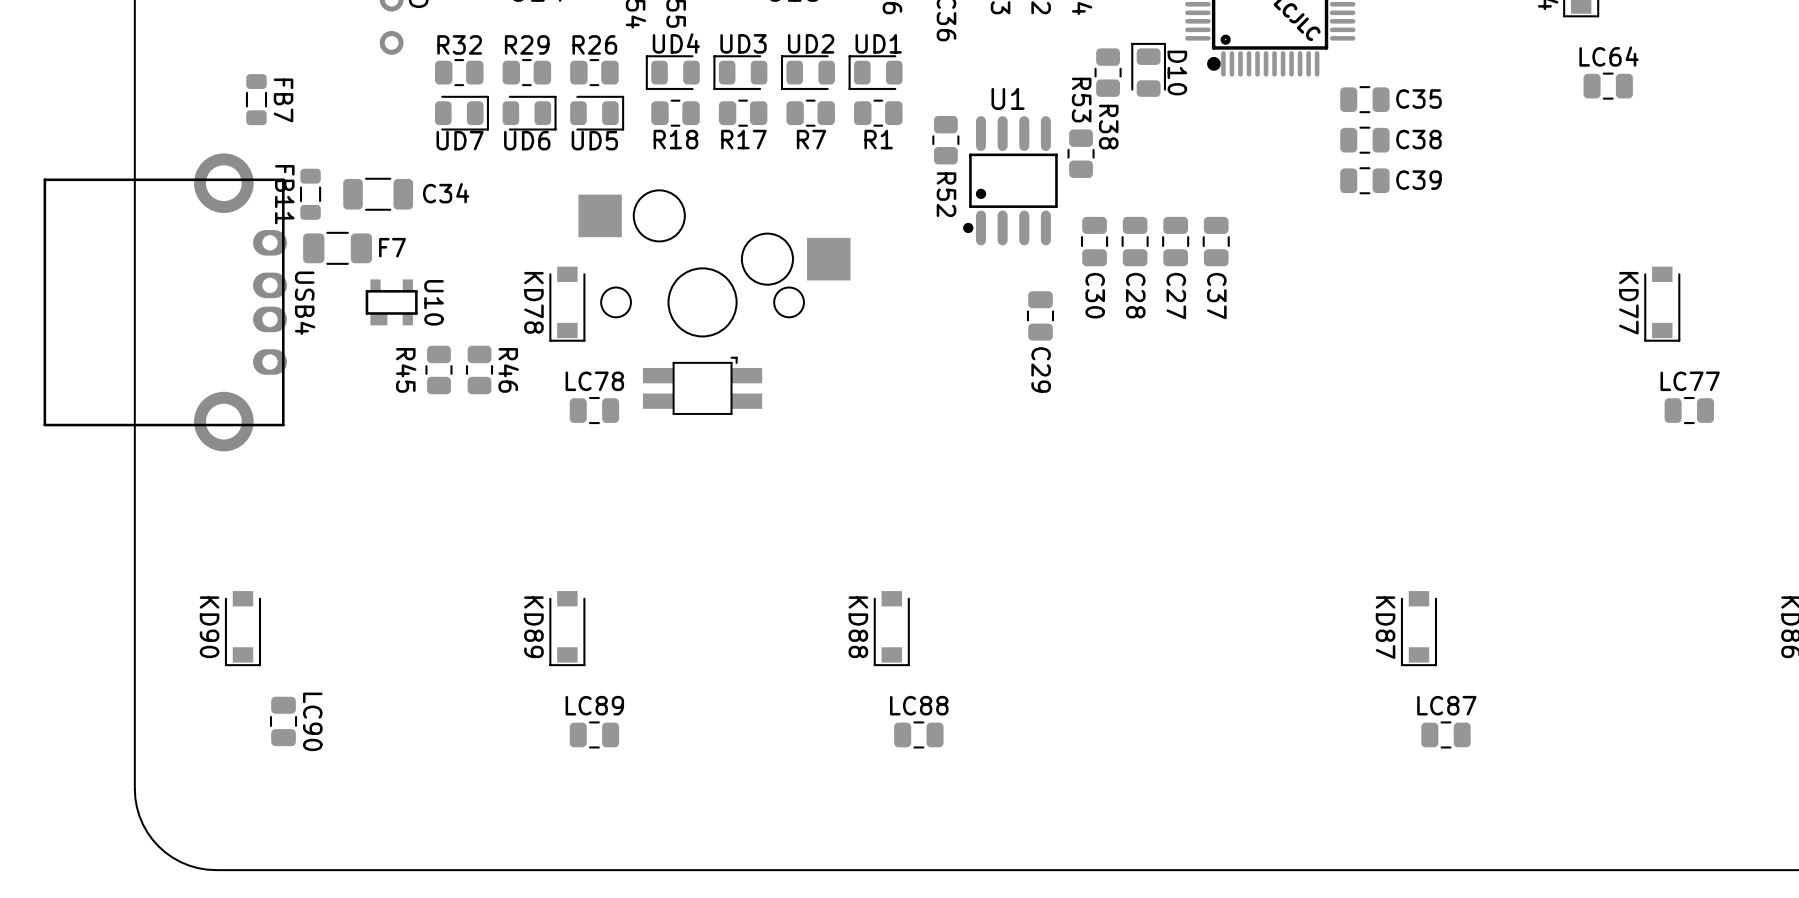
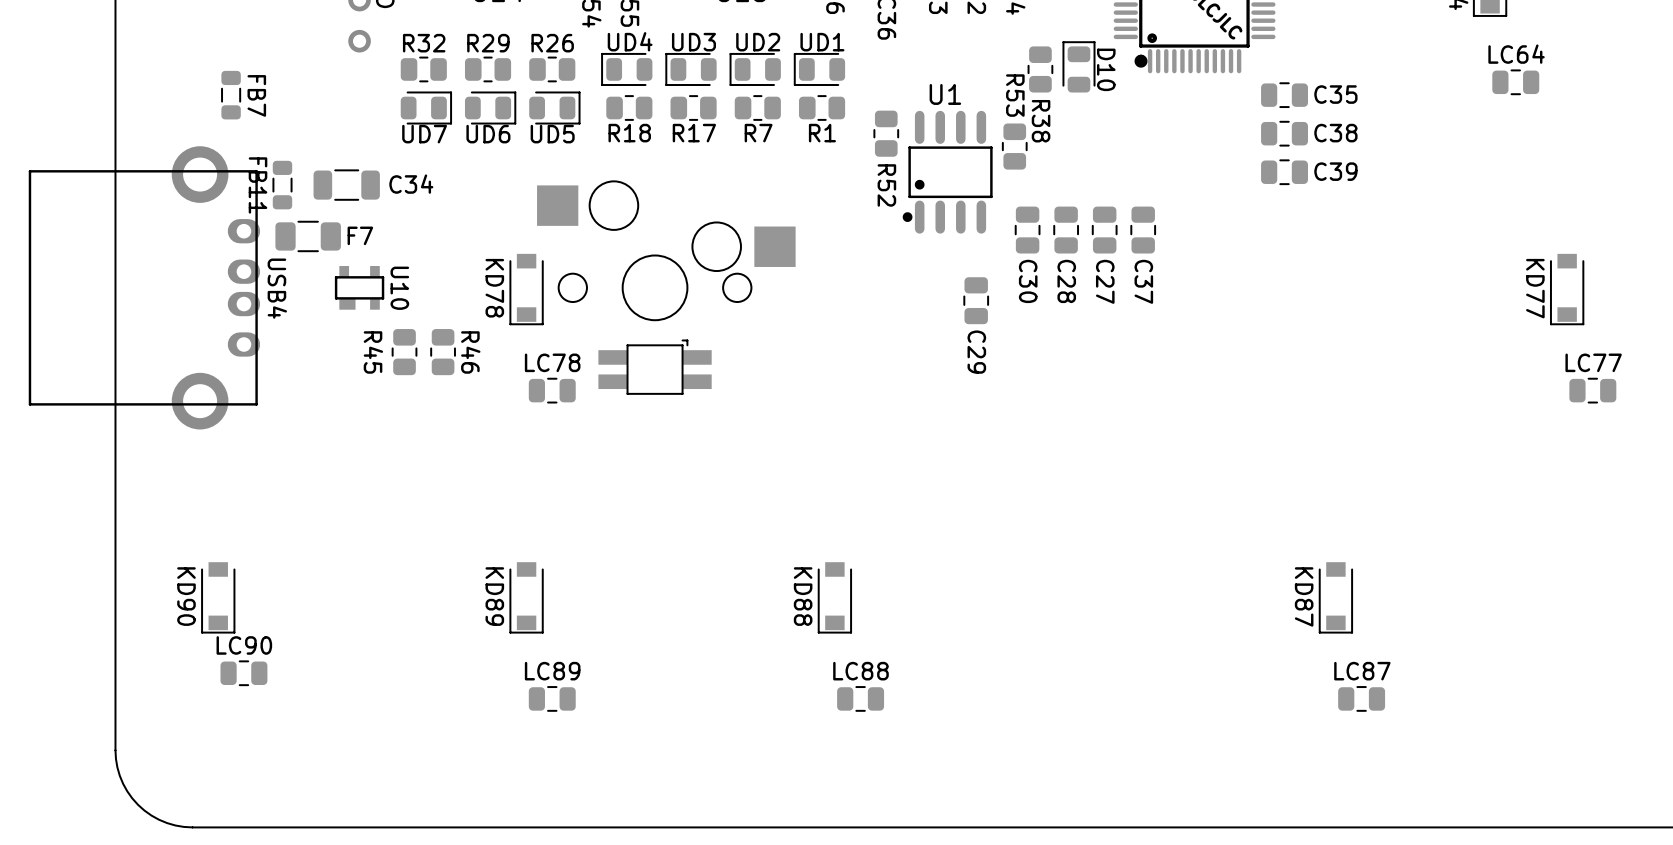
LC90 rotation: 0° (283, 721) -> 90° clockwise (243, 673)
LC90 name position: LC90 (312, 721) -> LC90 (244, 645)

